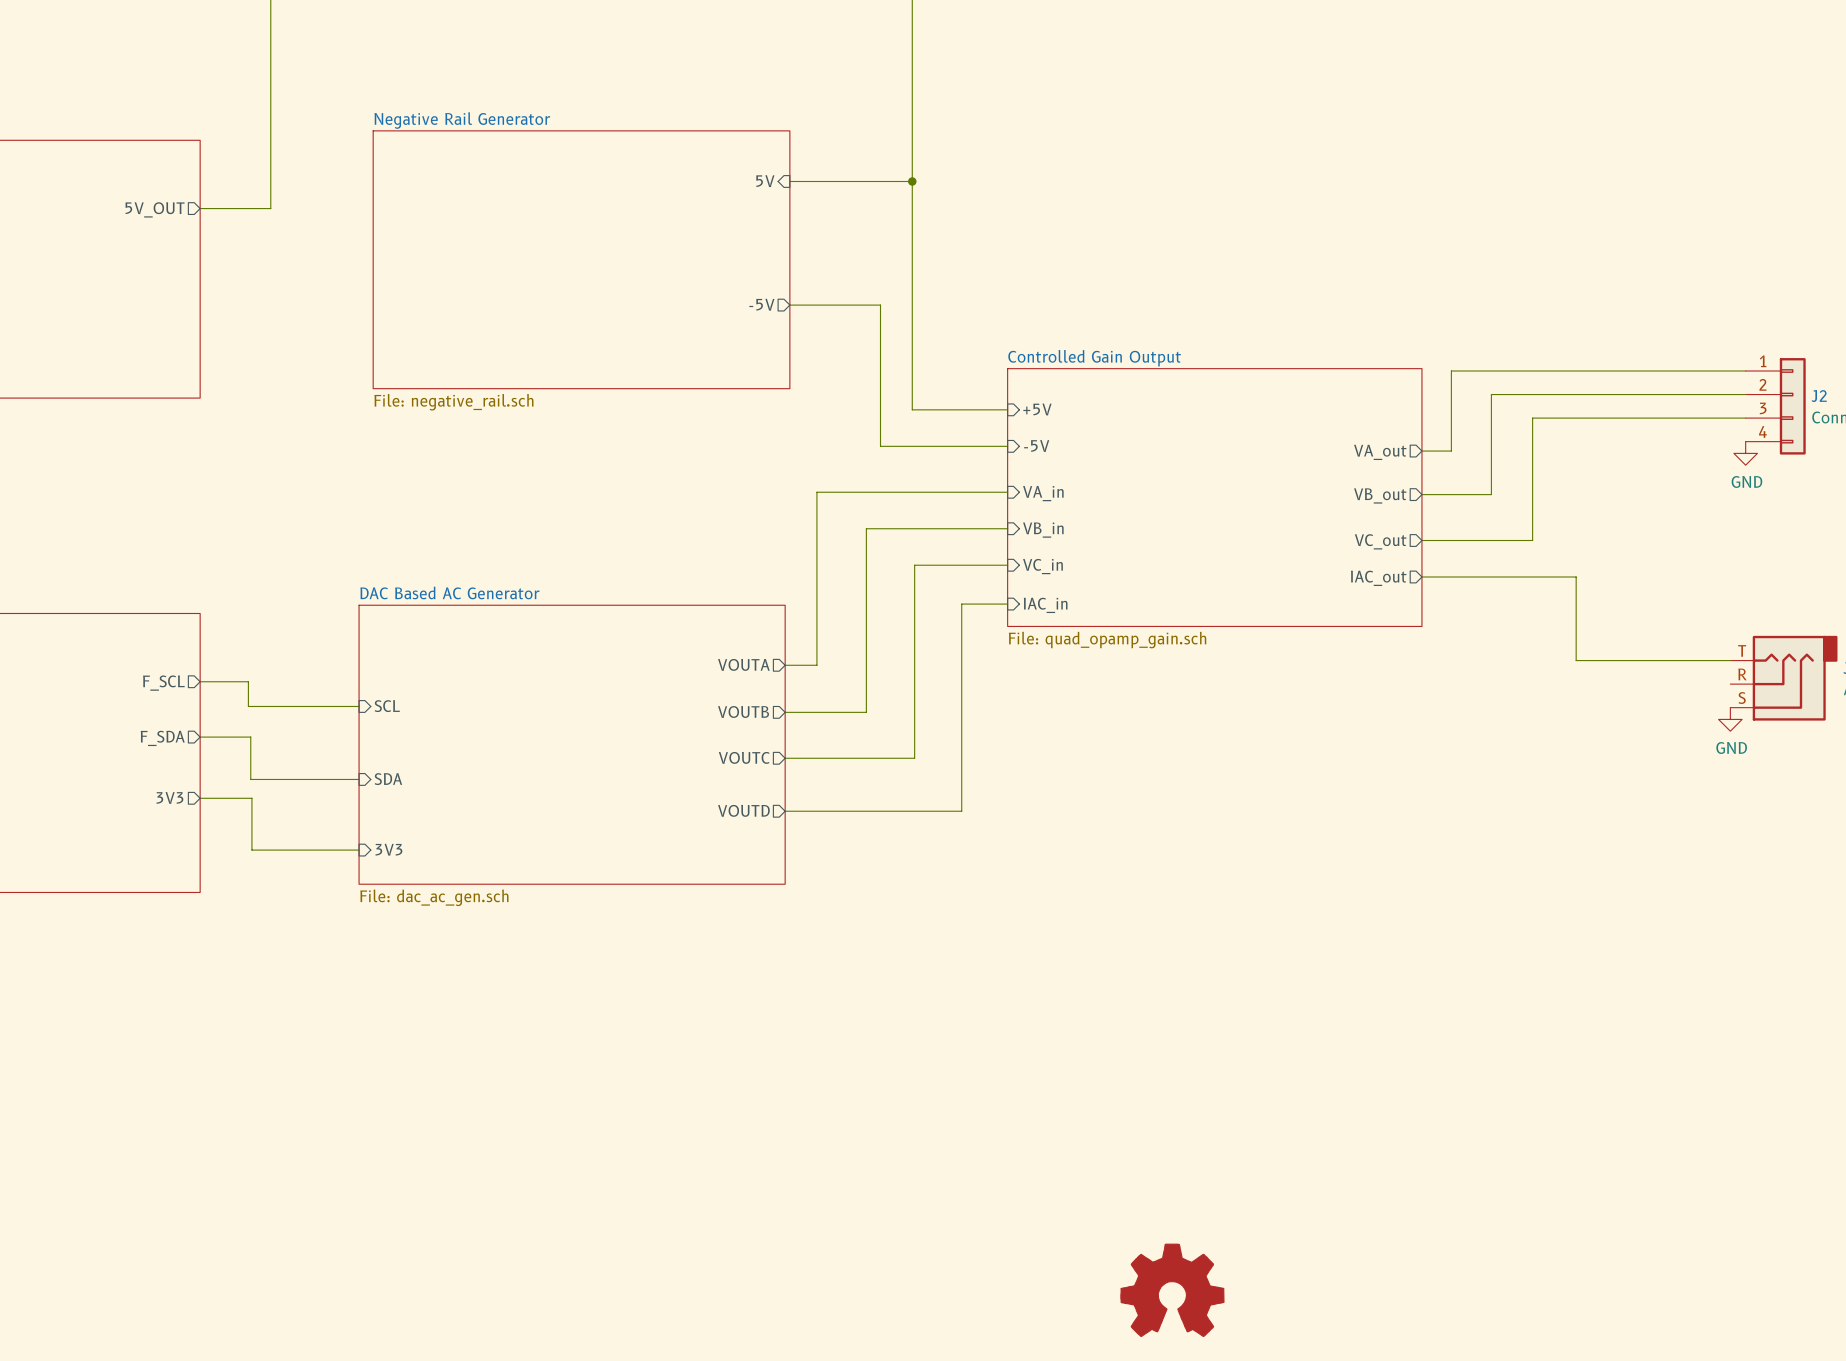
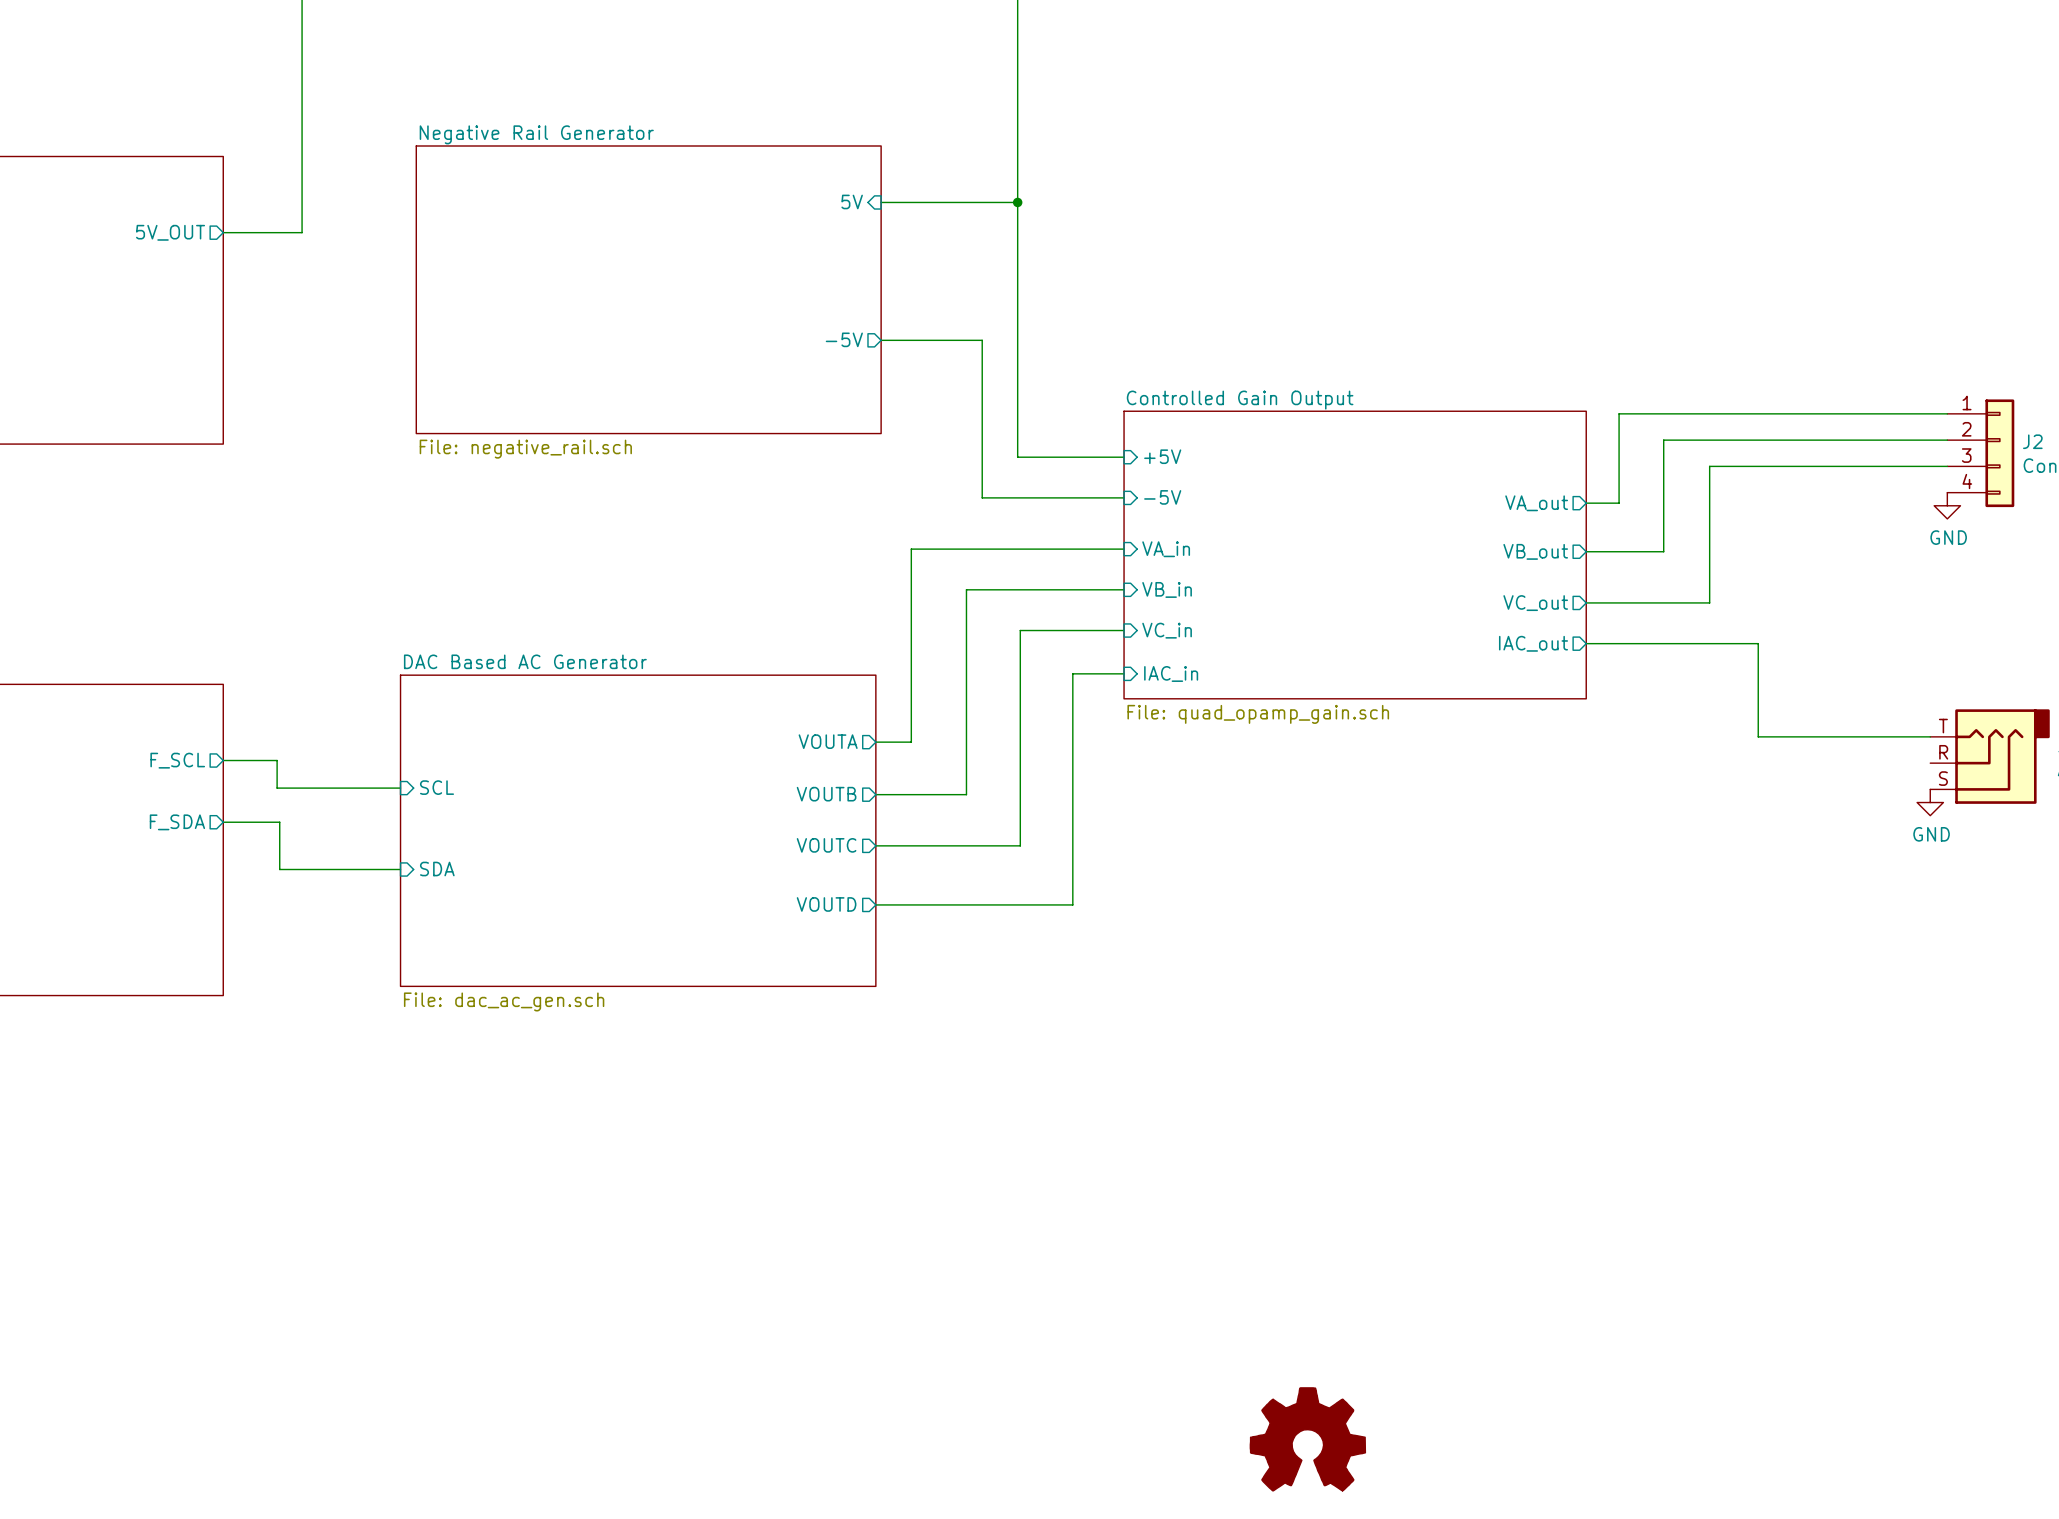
sheet pin: 3V3 (169, 797) -> none
wire: (200, 798) (251, 798) (251, 850) (359, 850) -> none
sheet pin: 3V3 (388, 849) -> none

